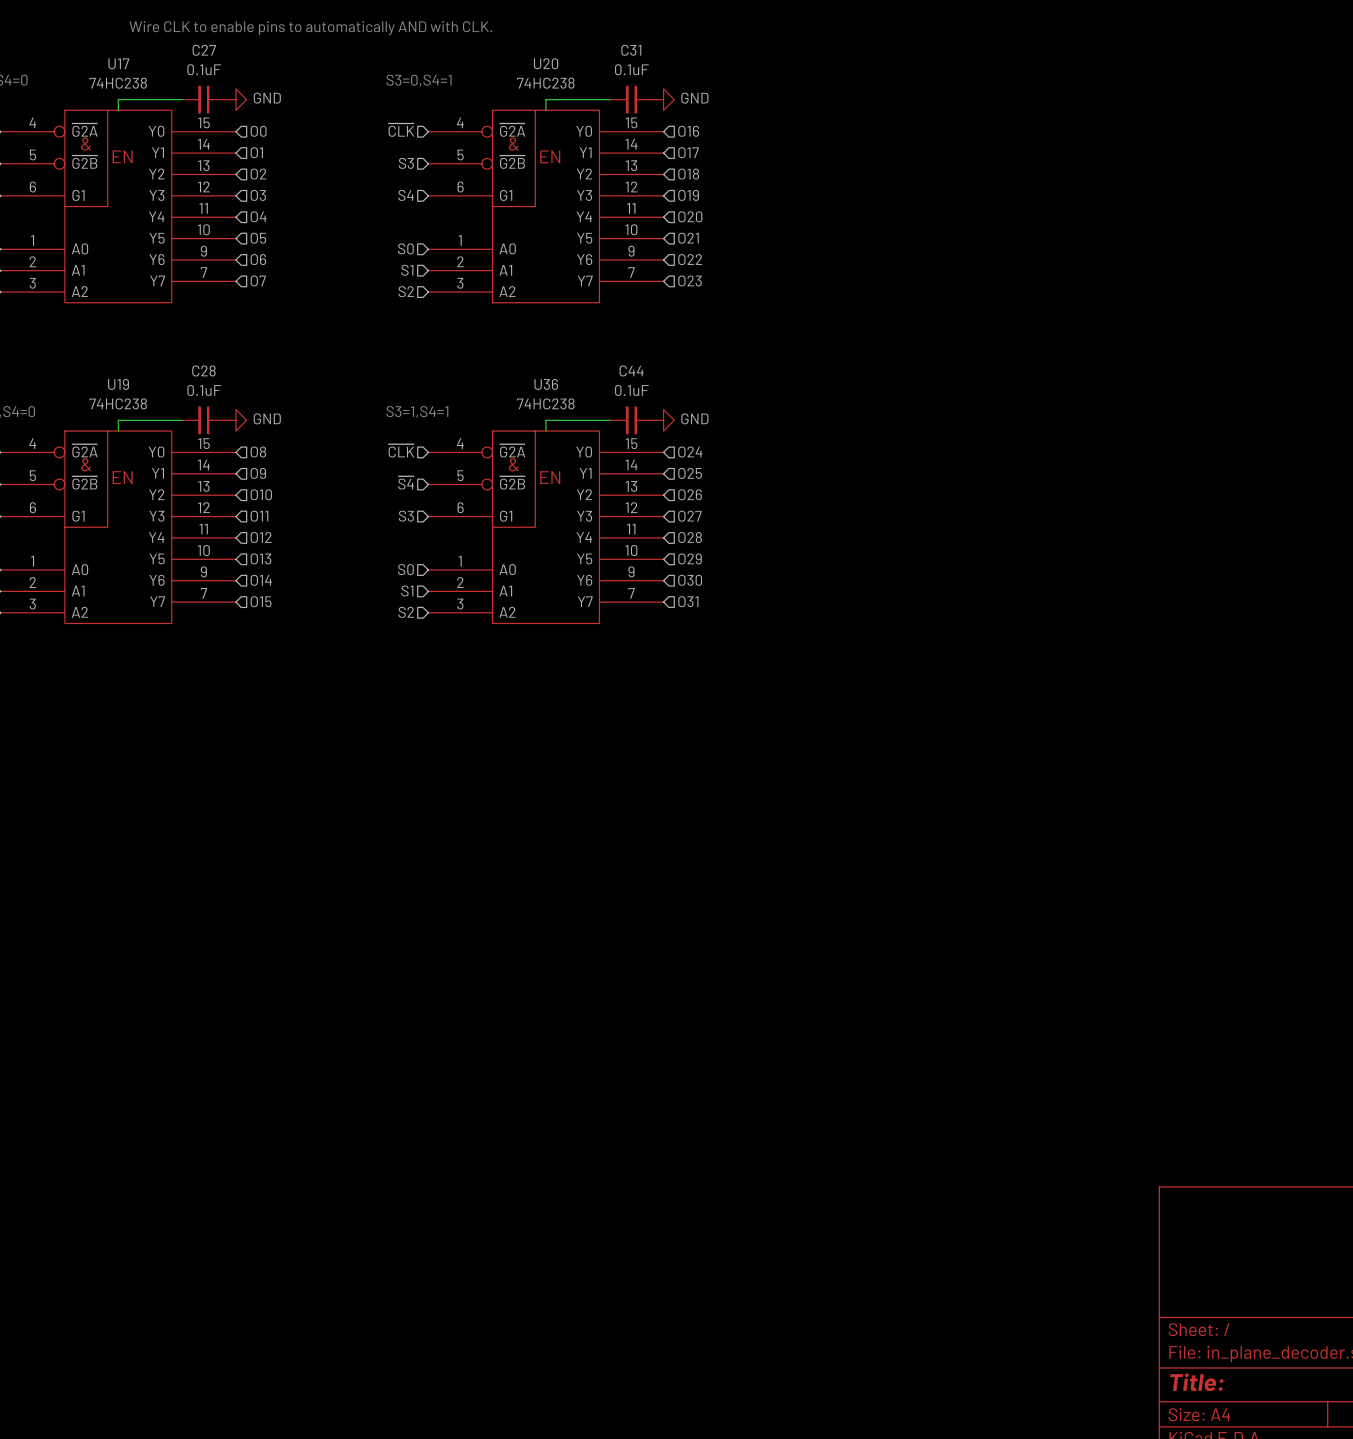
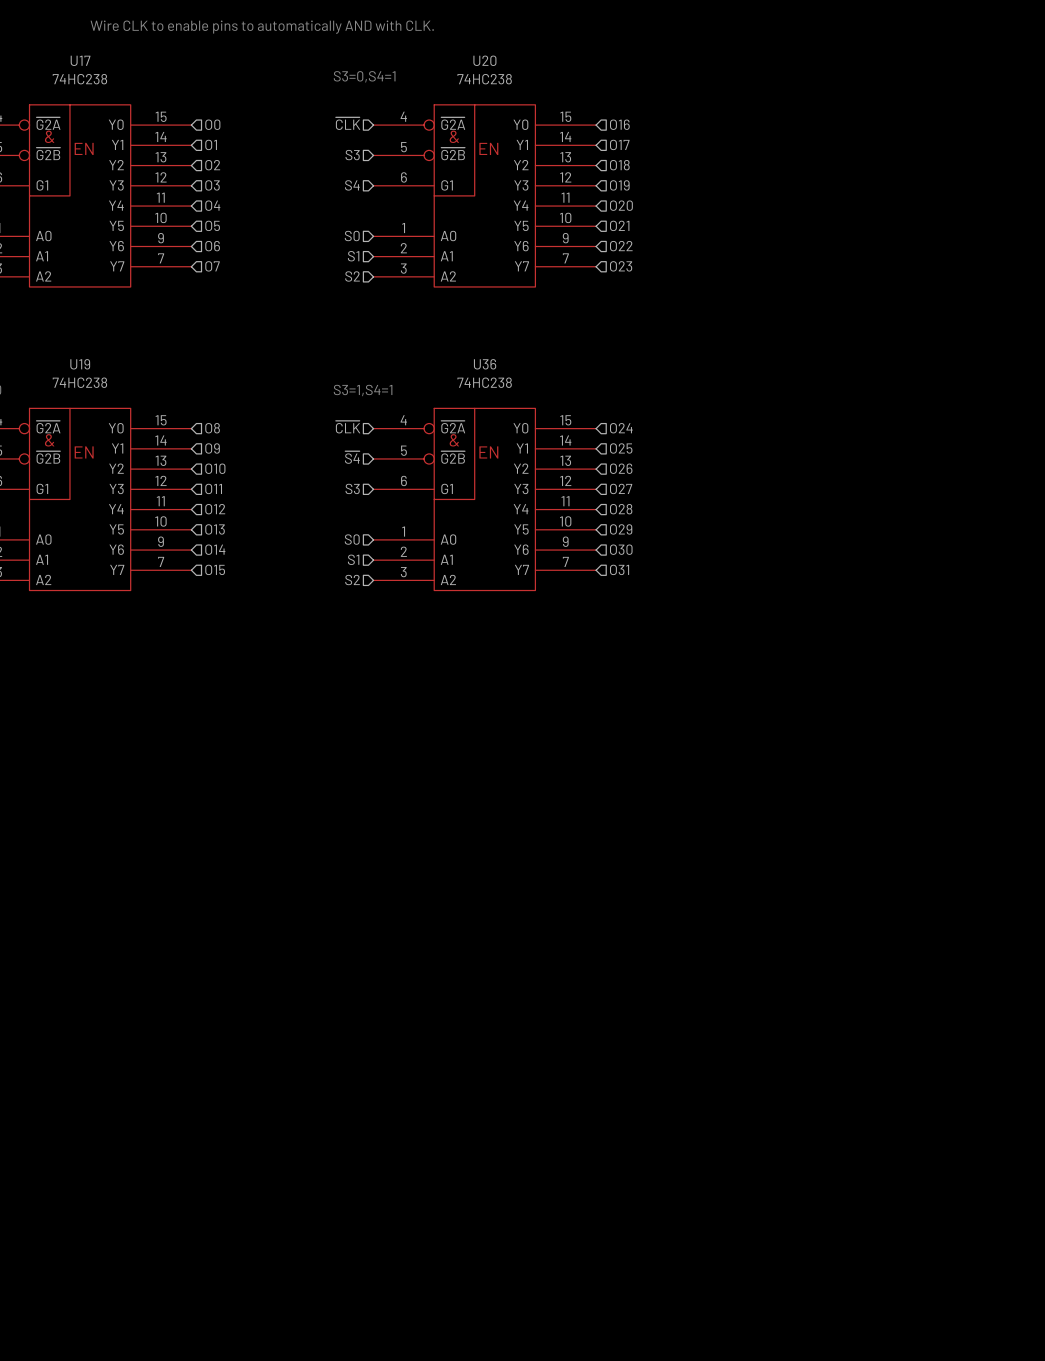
wire: (182, 99) (118, 99) (118, 110) -> none
C27: 0.1uF (203, 99) -> none
power symbol: GND (235, 99) -> none
wire: (610, 99) (545, 99) (545, 110) -> none
C31: 0.1uF (631, 99) -> none
power symbol: GND (663, 99) -> none
wire: (182, 420) (118, 420) (118, 431) -> none
C28: 0.1uF (203, 420) -> none
power symbol: GND (235, 420) -> none
wire: (610, 420) (545, 420) (545, 431) -> none
C44: 0.1uF (631, 420) -> none
power symbol: GND (663, 420) -> none

